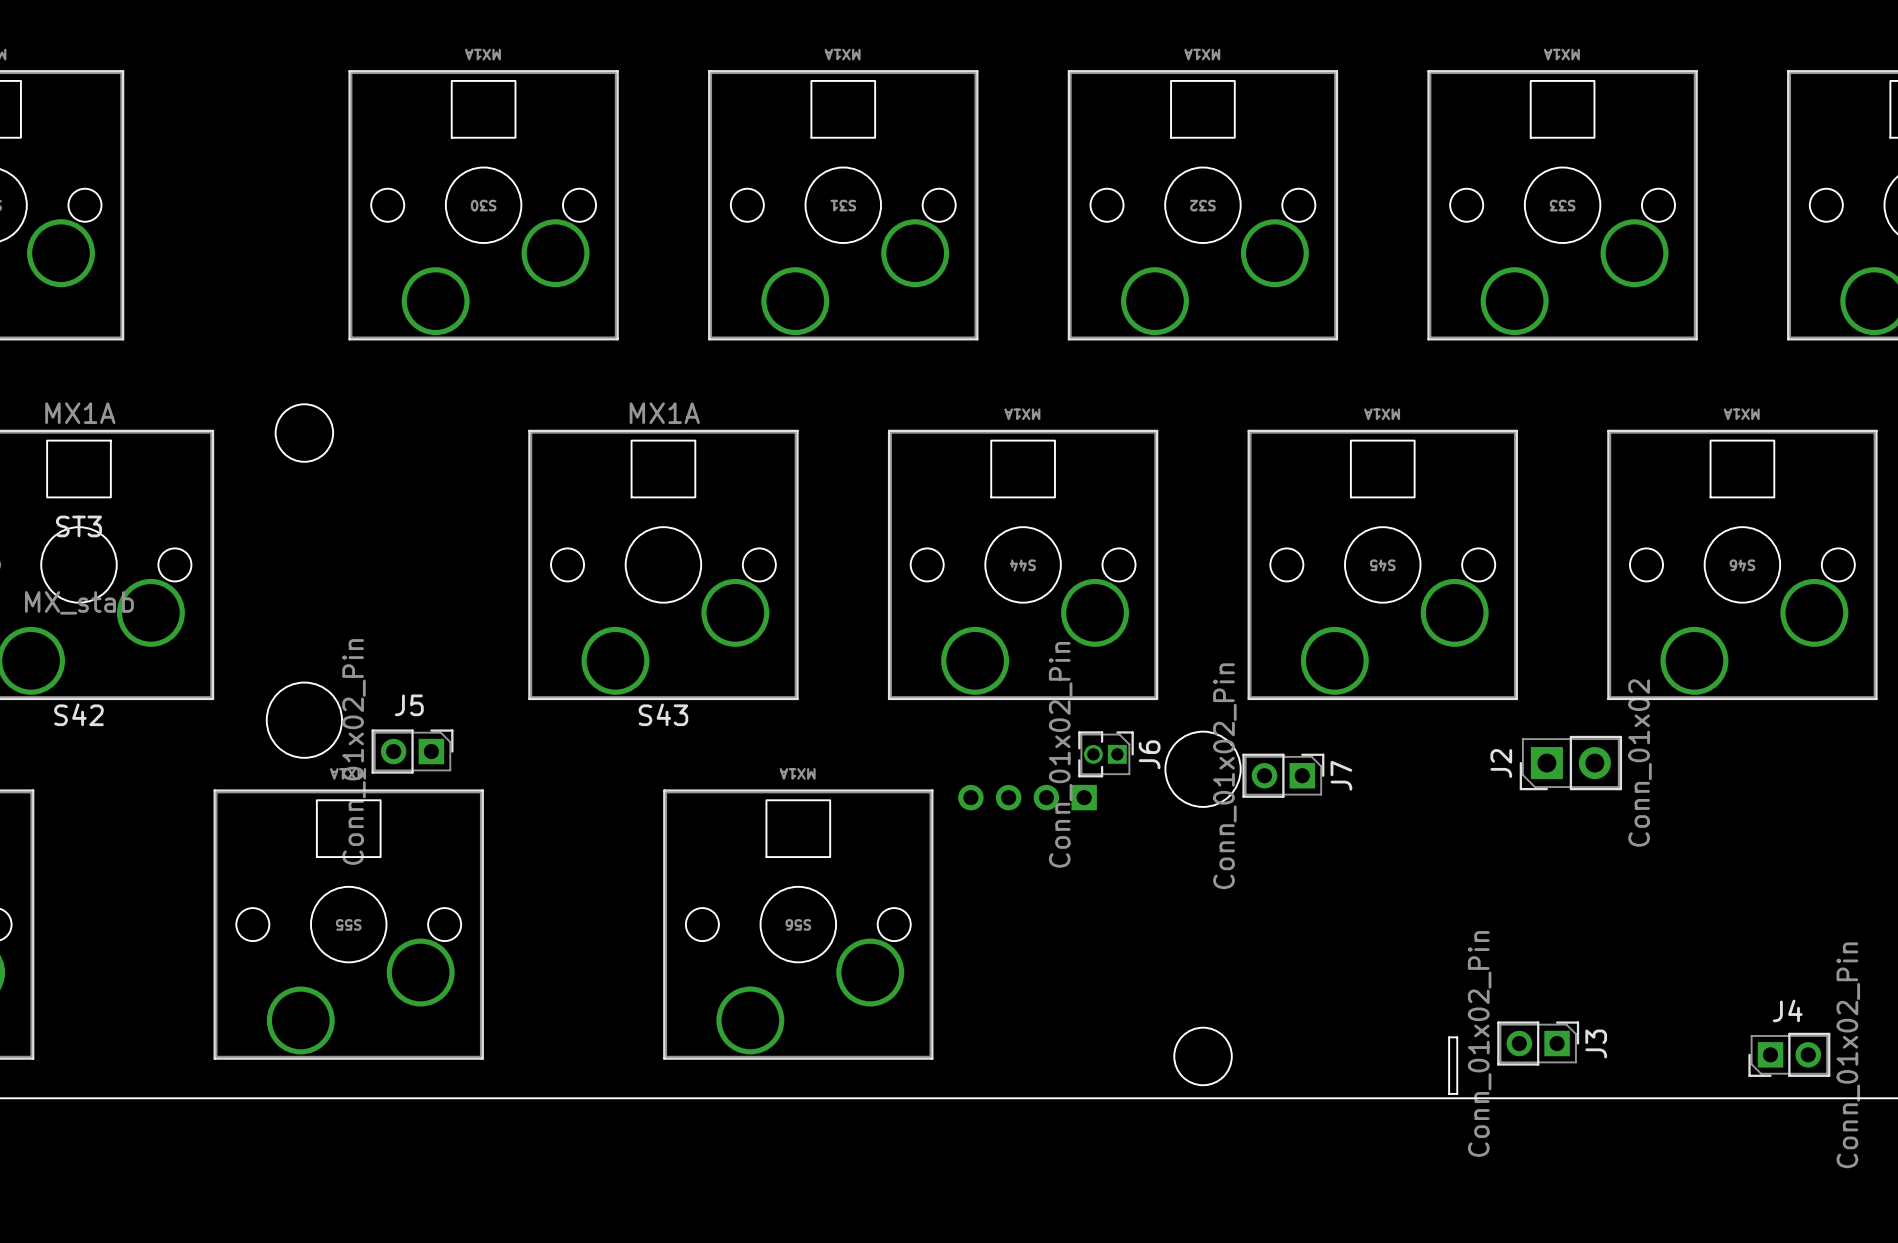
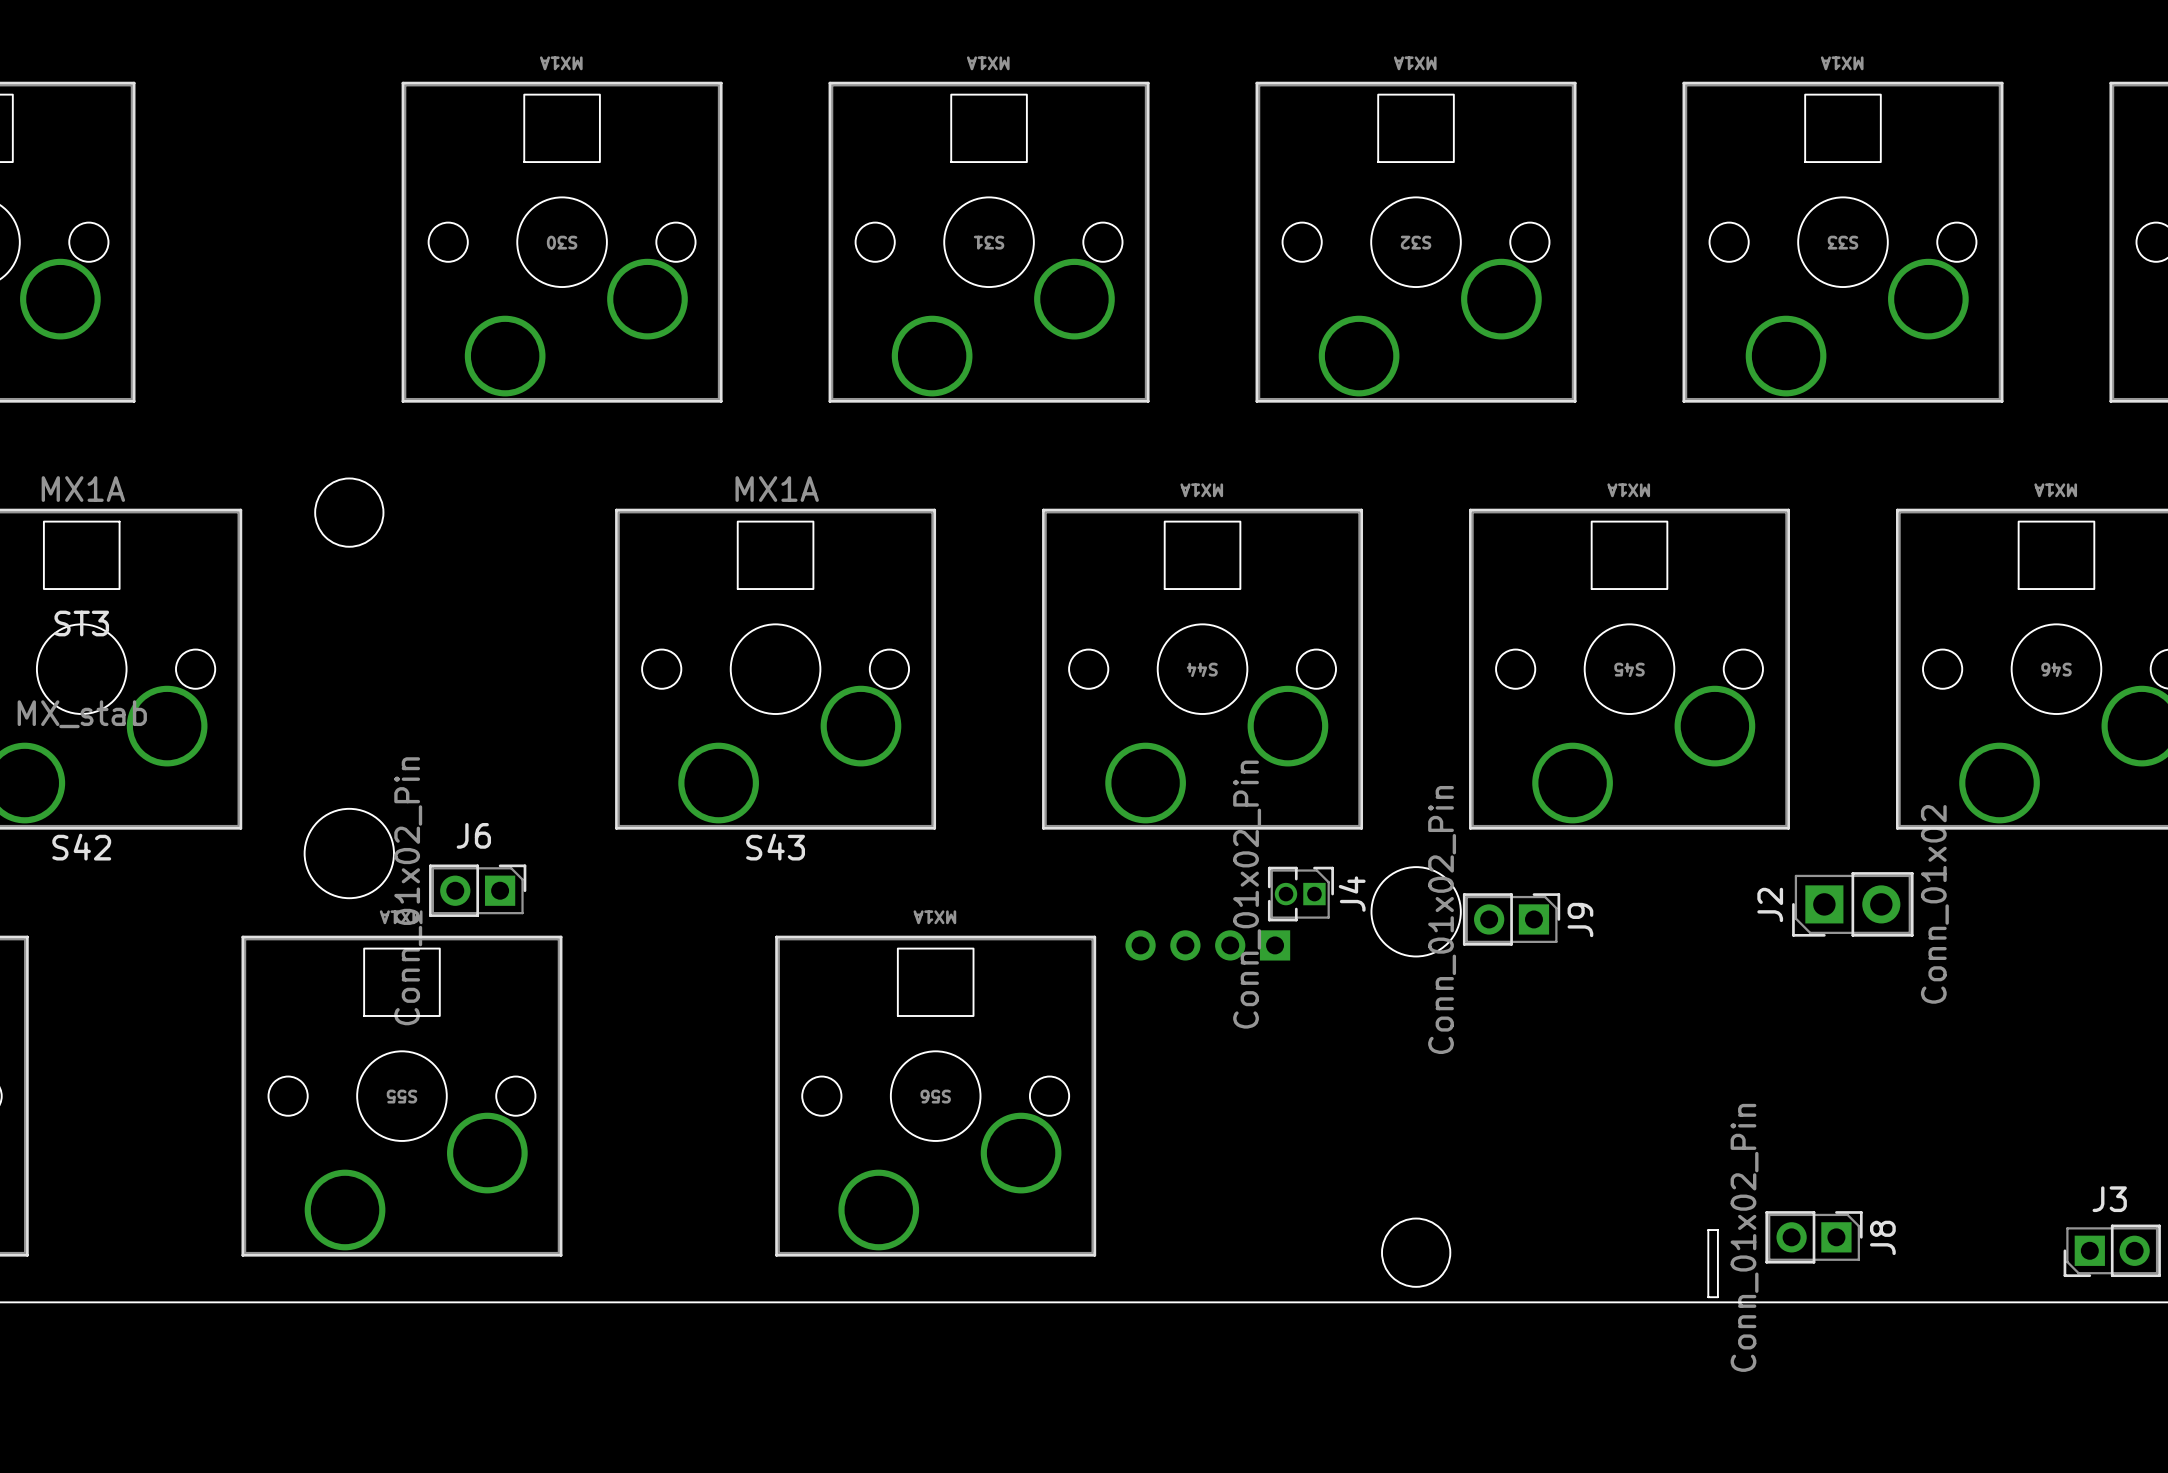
J5 name: J5 (409, 705) -> J6 (473, 835)
J6 name: J6 (1149, 754) -> J4 (1352, 894)
J7 name: J7 (1341, 775) -> J9 (1580, 919)
J4 name: J4 (1787, 1010) -> J3 (2109, 1199)
J3 name: J3 (1596, 1043) -> J8 (1882, 1237)

